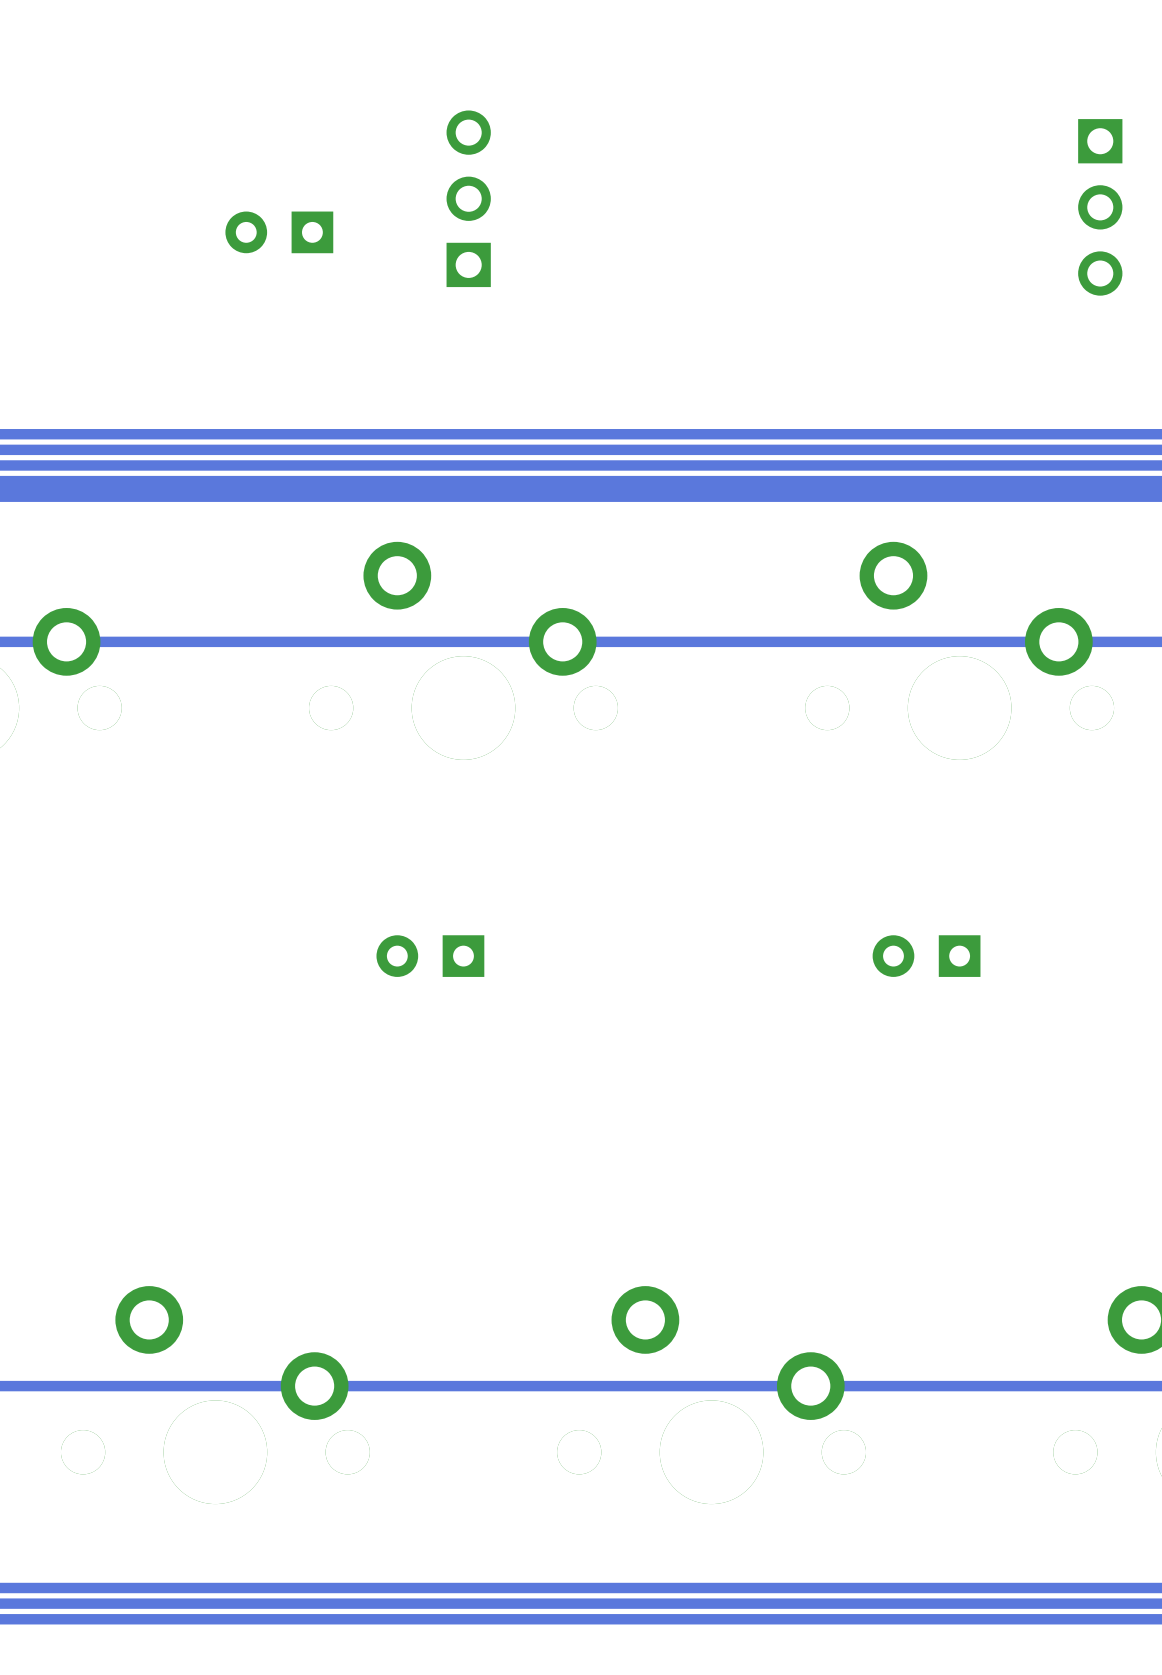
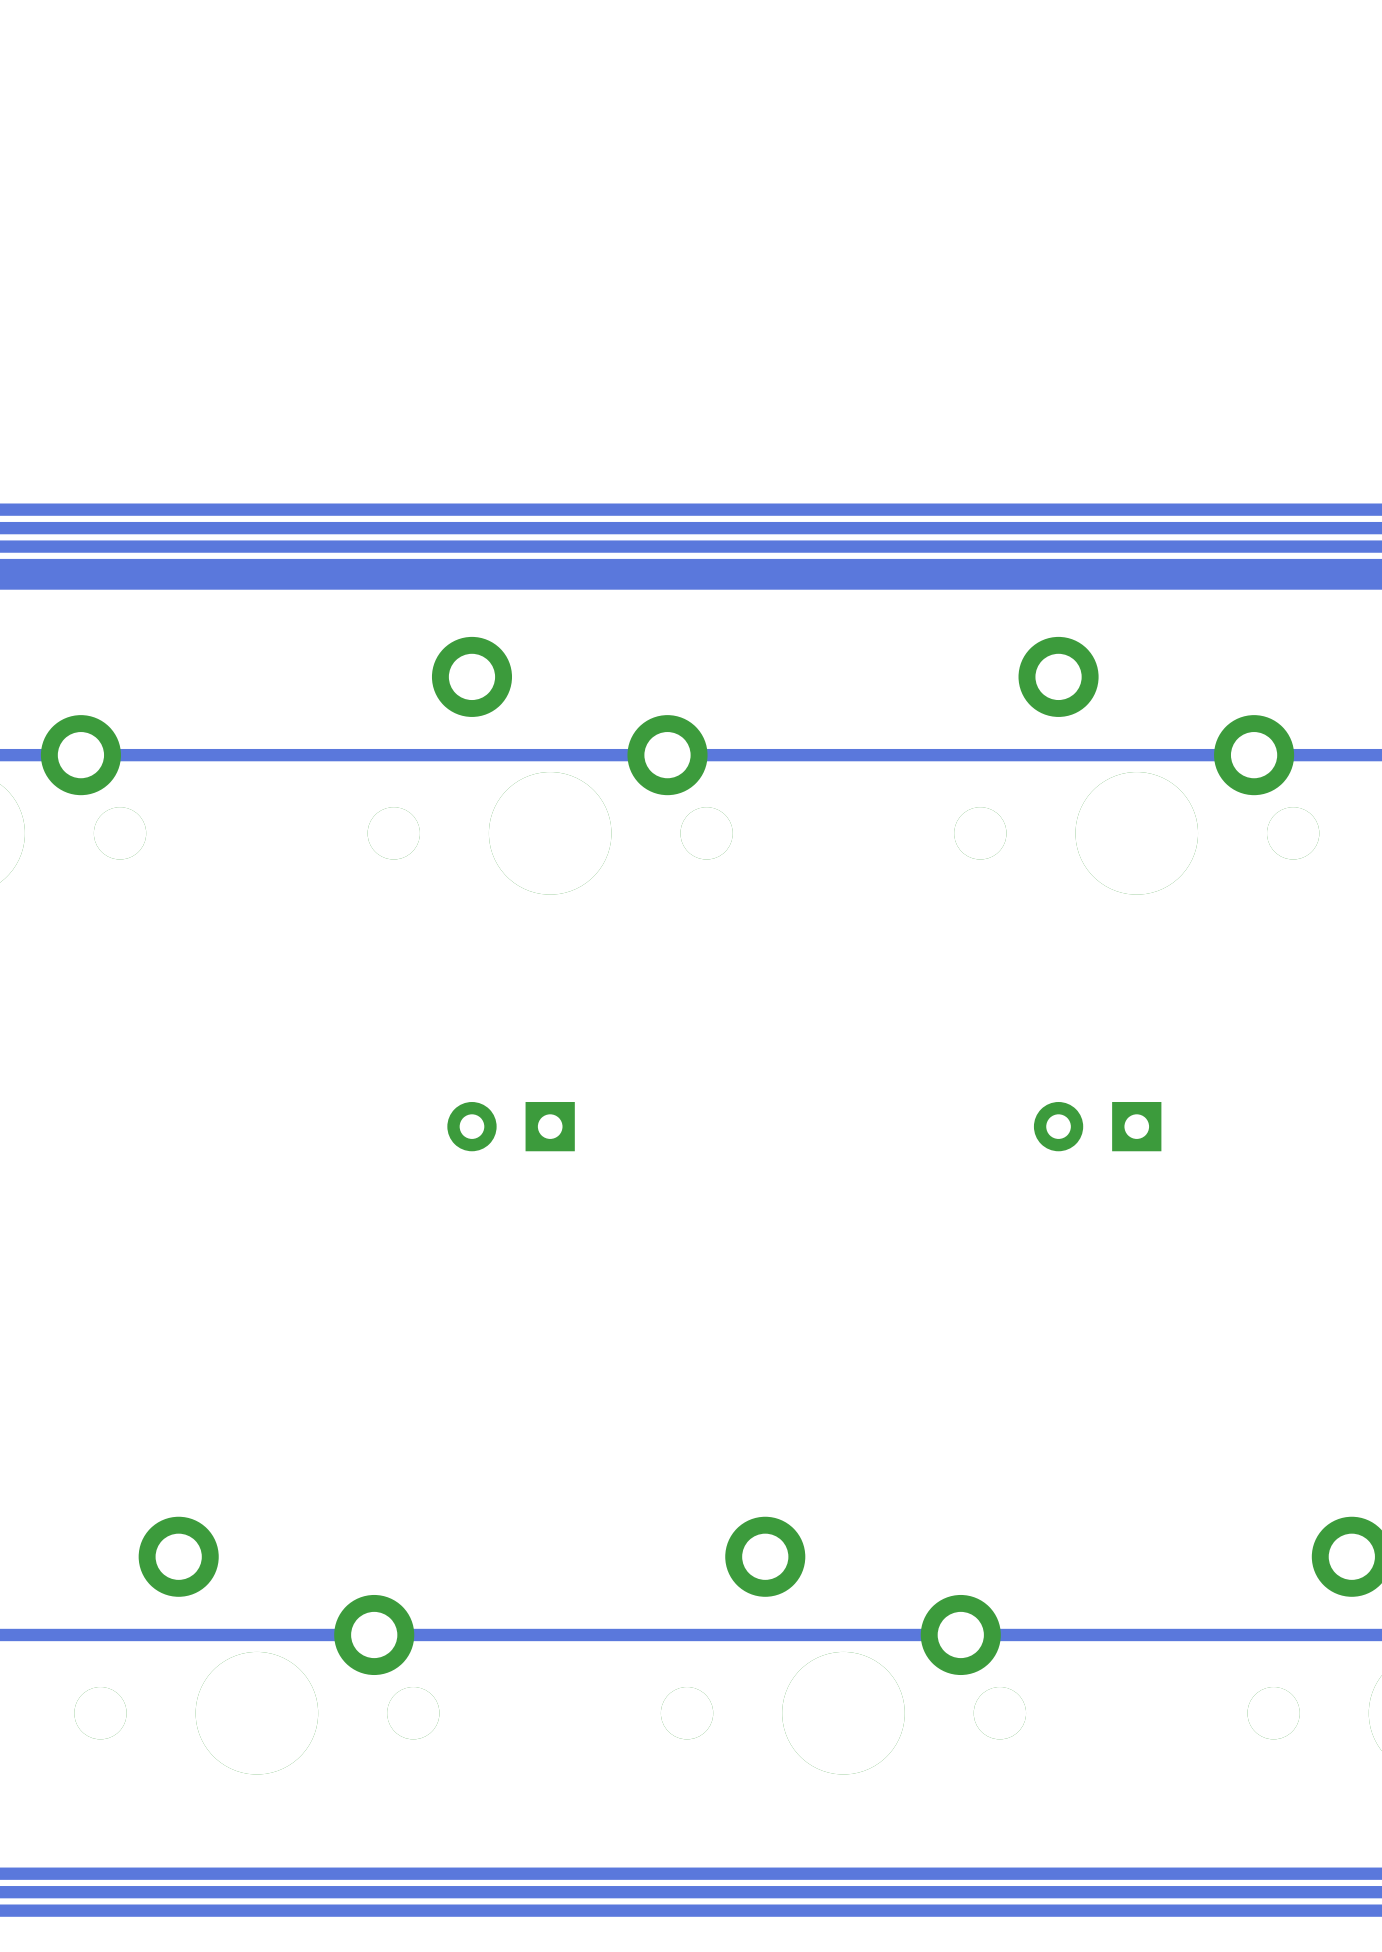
part: (468, 198) -> none
part: (1100, 207) -> none
part: (279, 232) -> none

